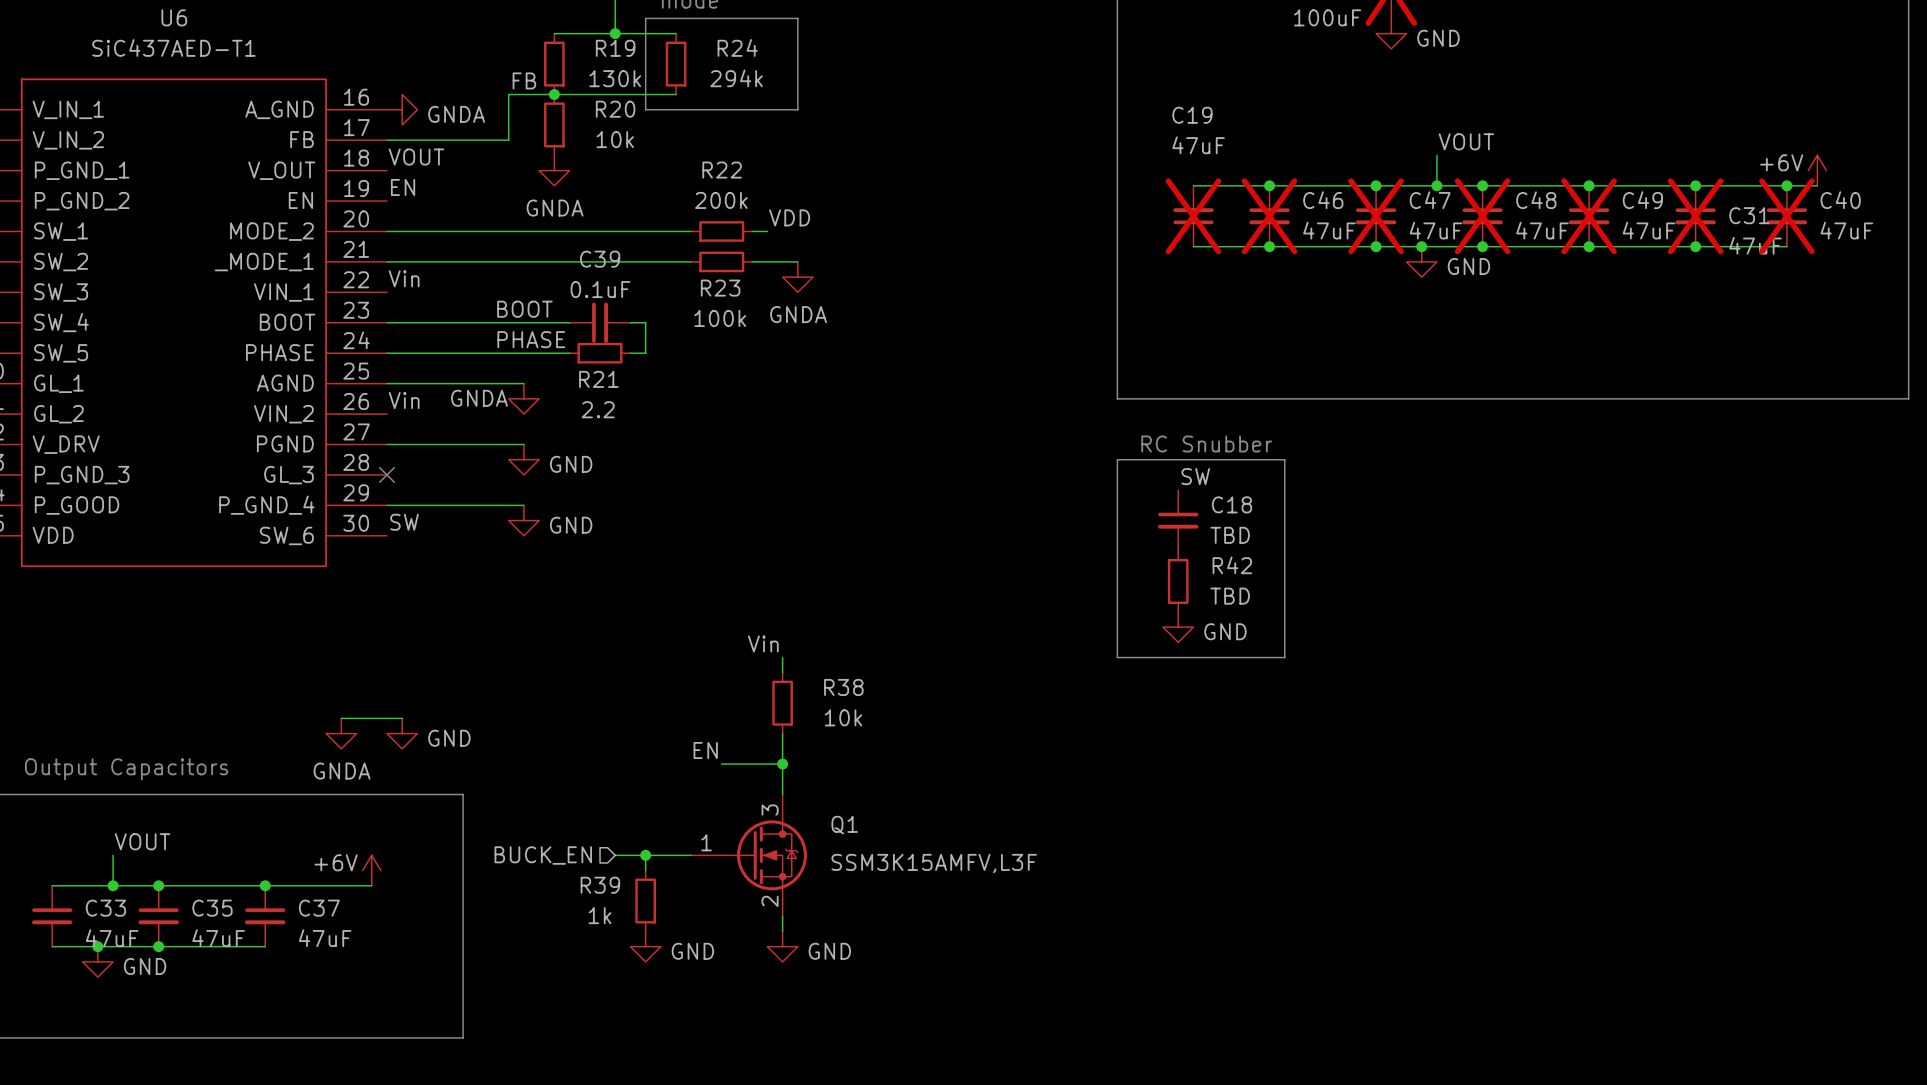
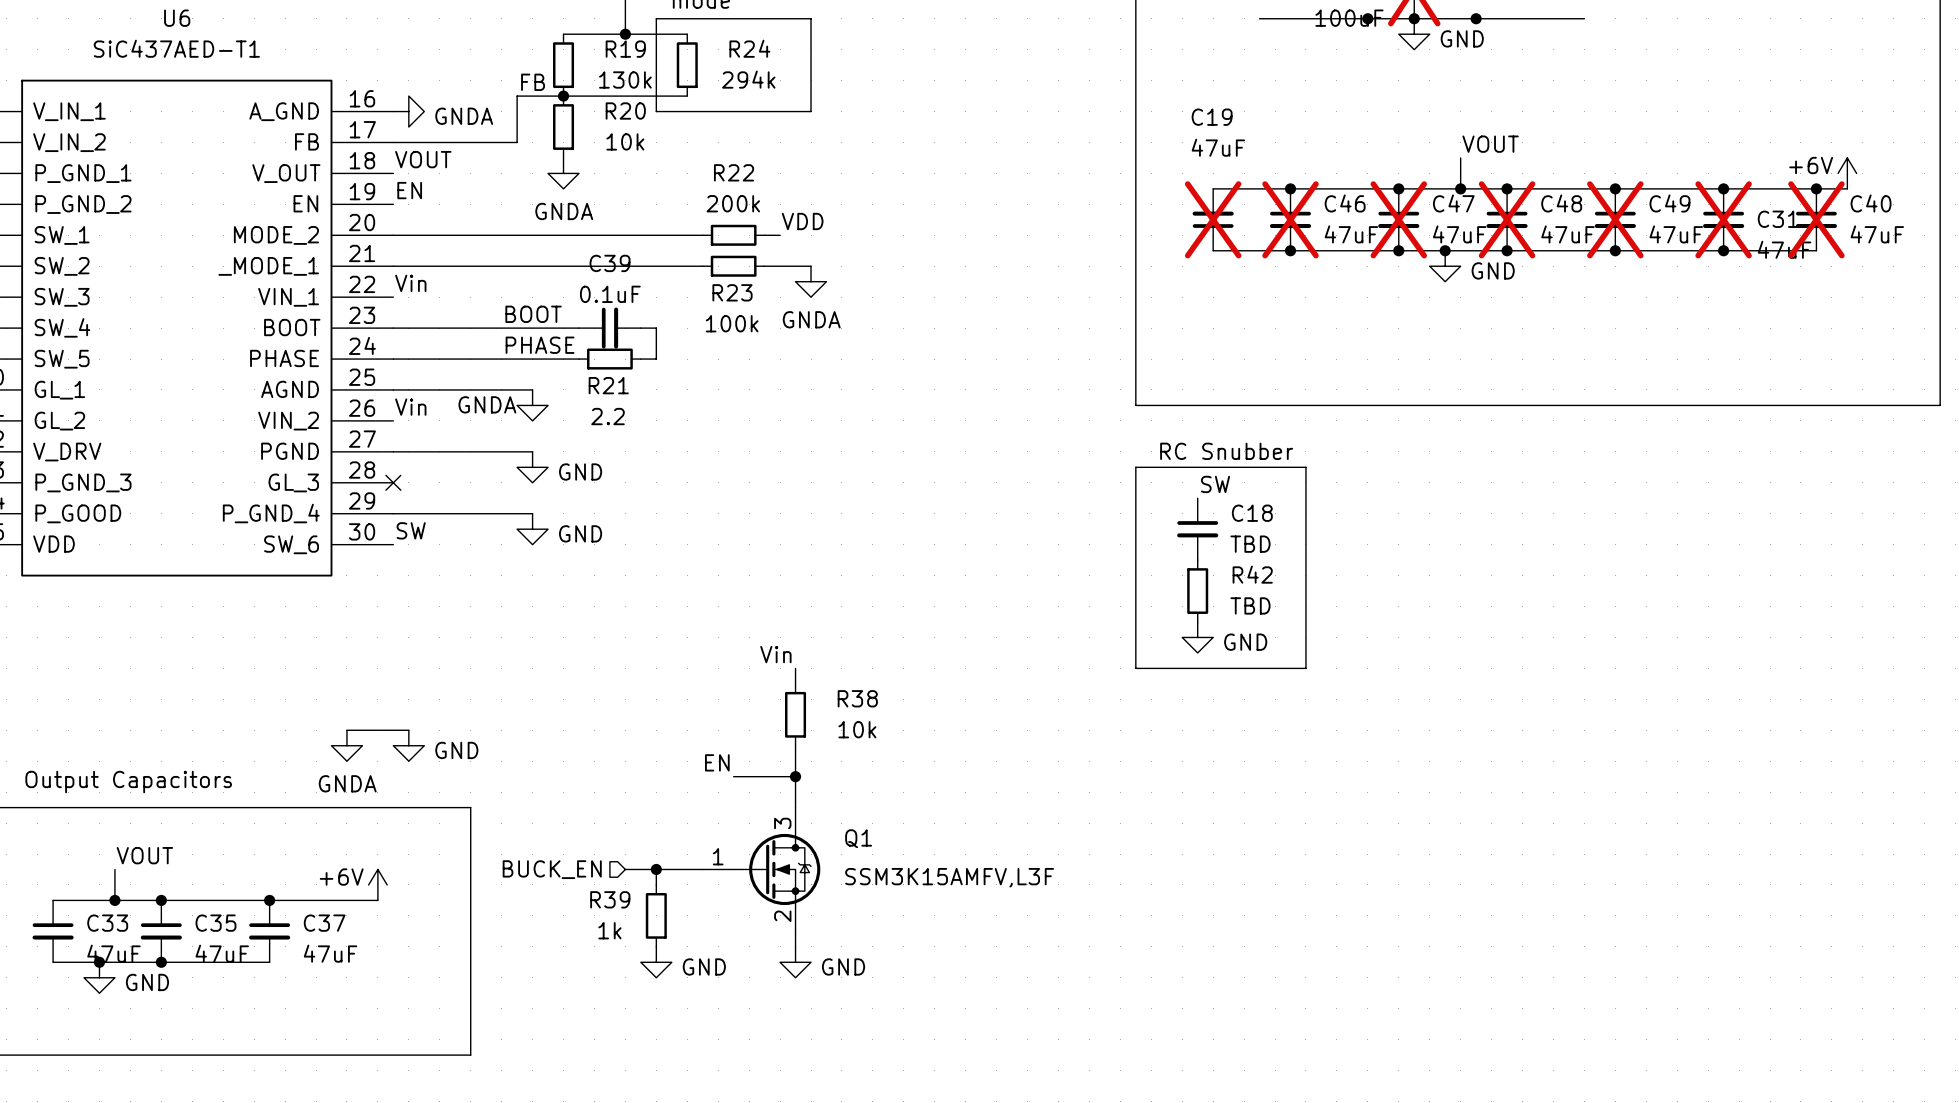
wire: none -> (1259, 18) (1584, 18)
junction: none -> (1367, 18)
junction: none -> (1414, 18)
junction: none -> (1476, 18)

